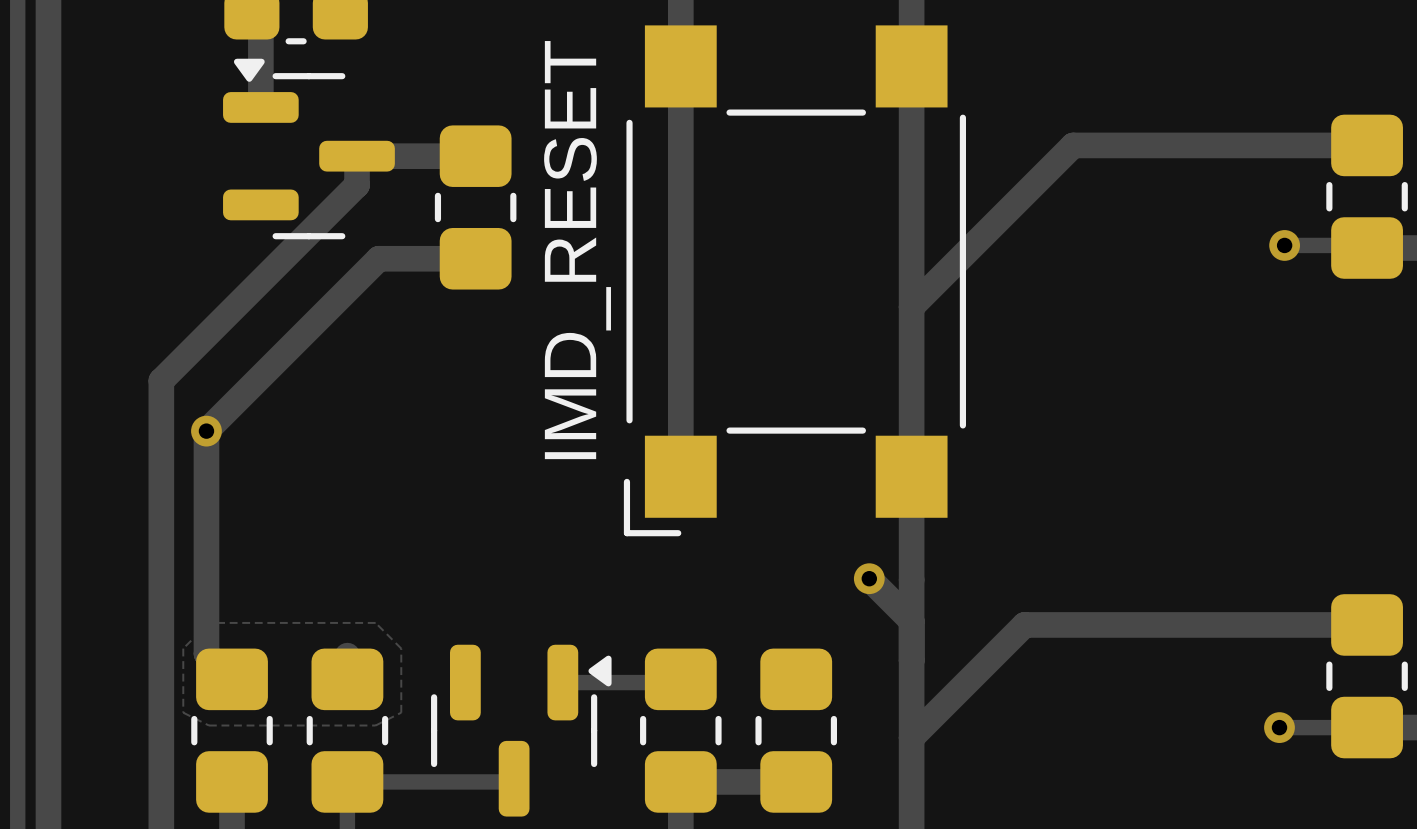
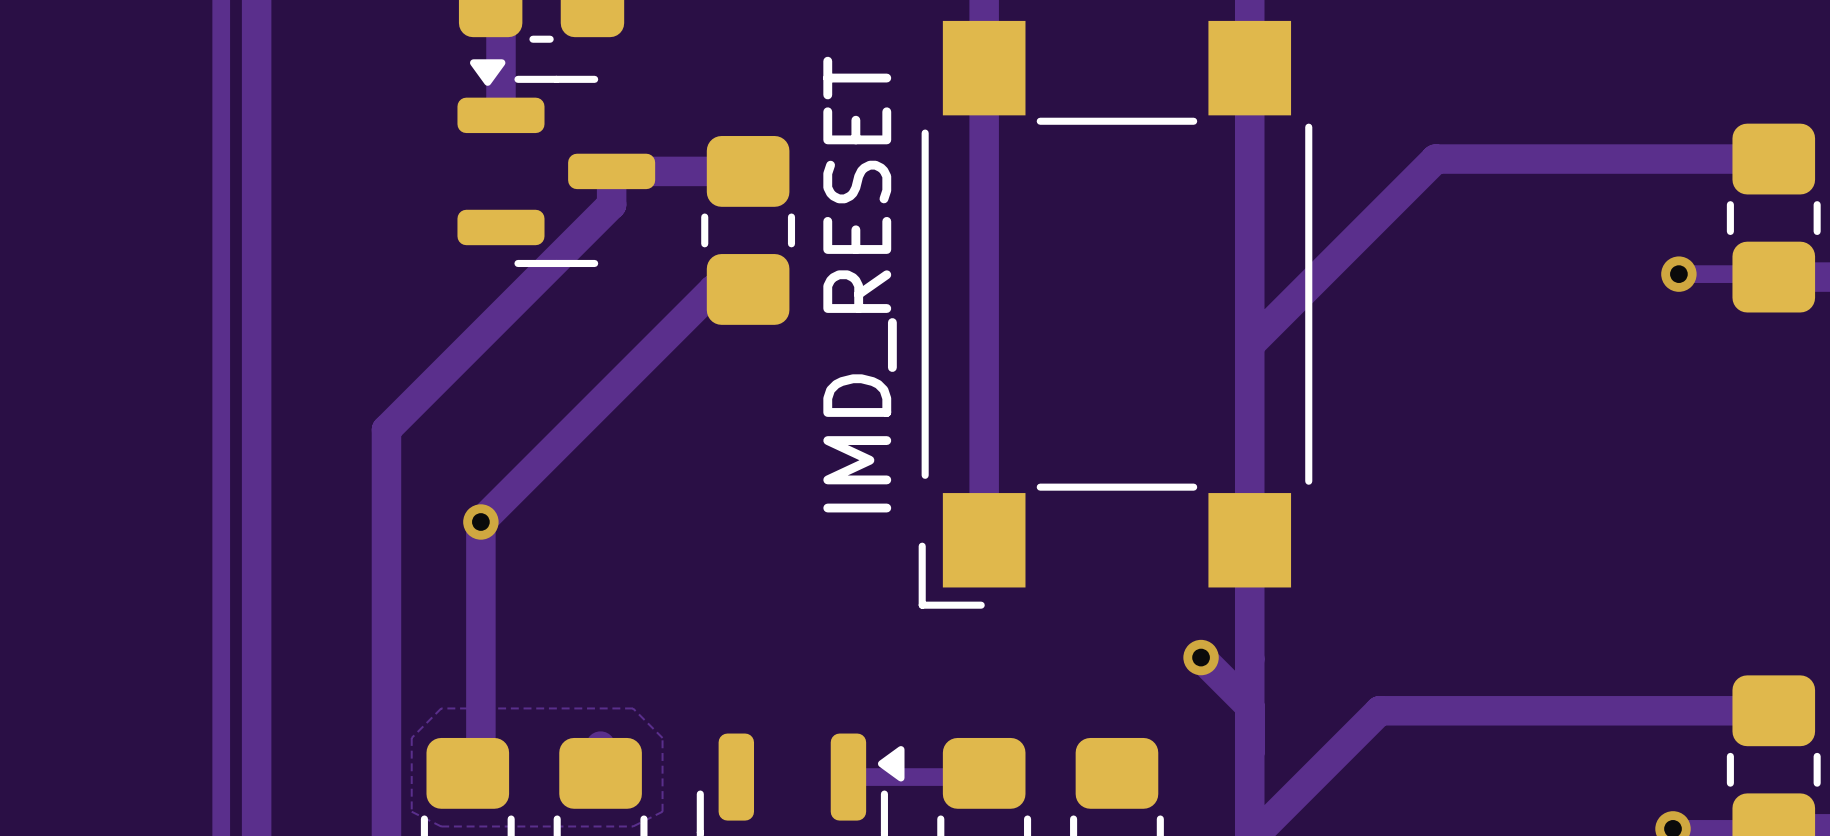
track: (445, 258) (378, 258) (206, 431) (206, 653) (232, 679) -> (713, 289) (480, 521) (480, 760) (467, 773)
via position: (206, 431) -> (480, 521)

